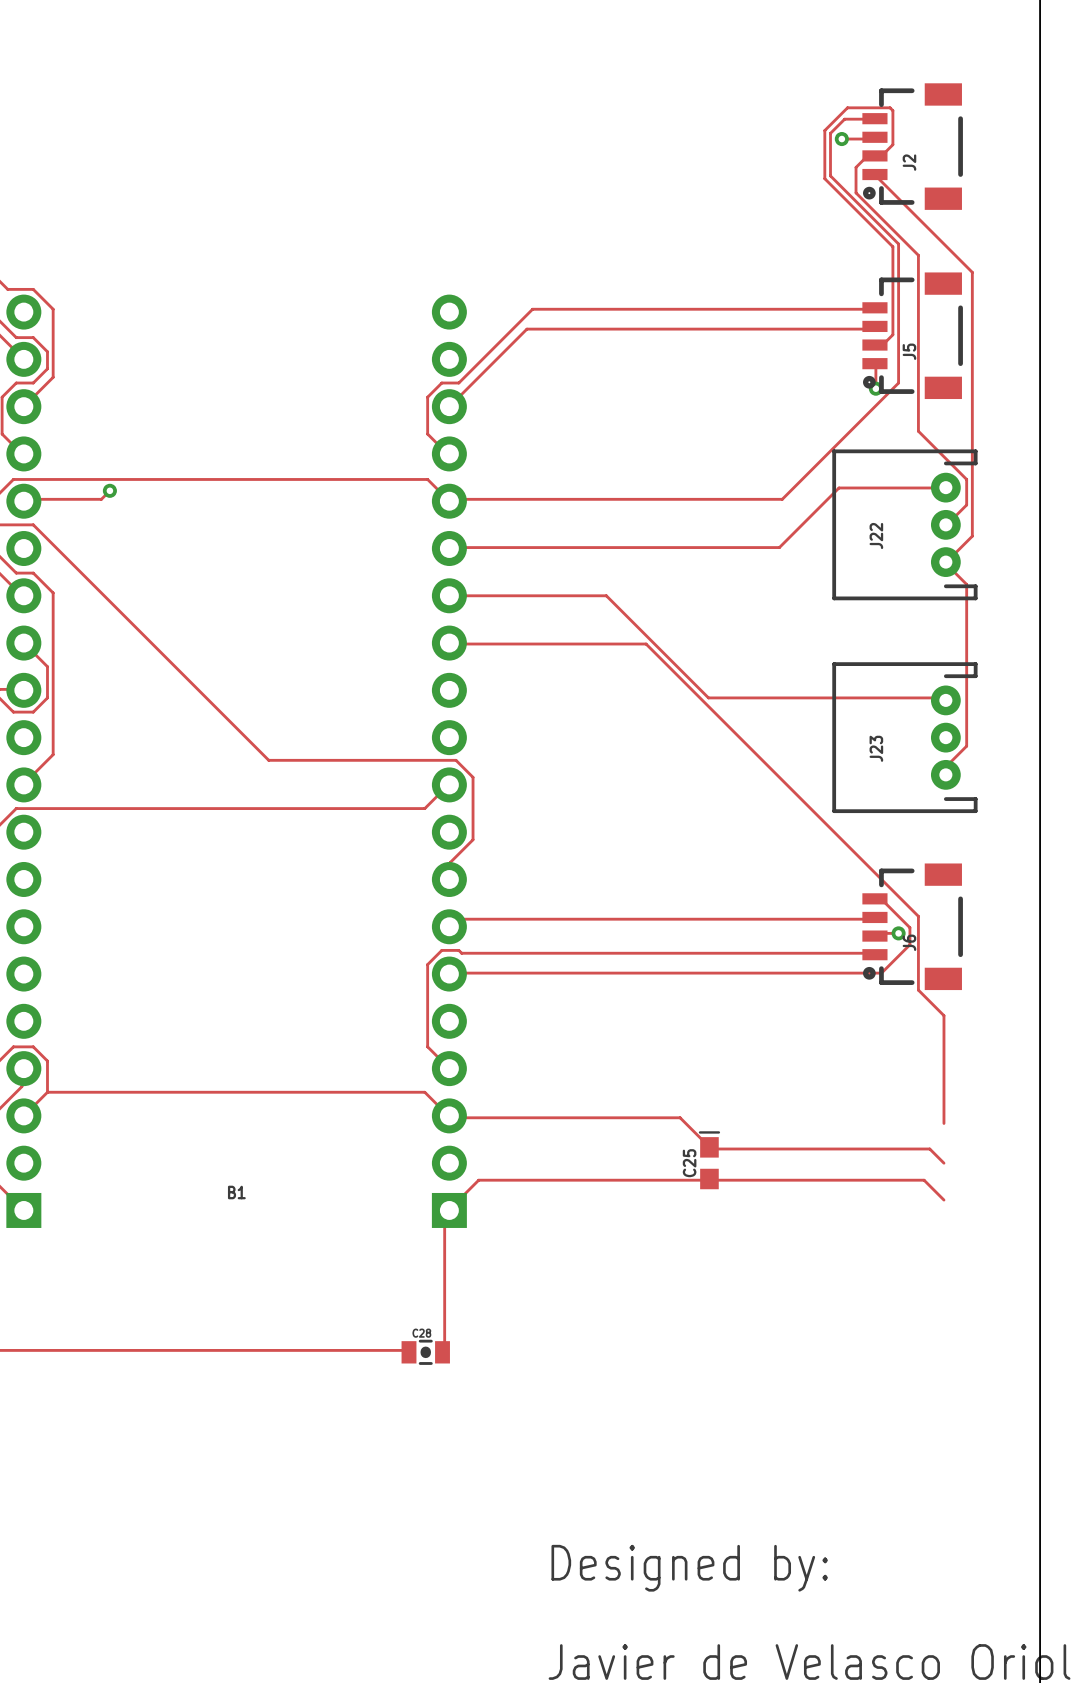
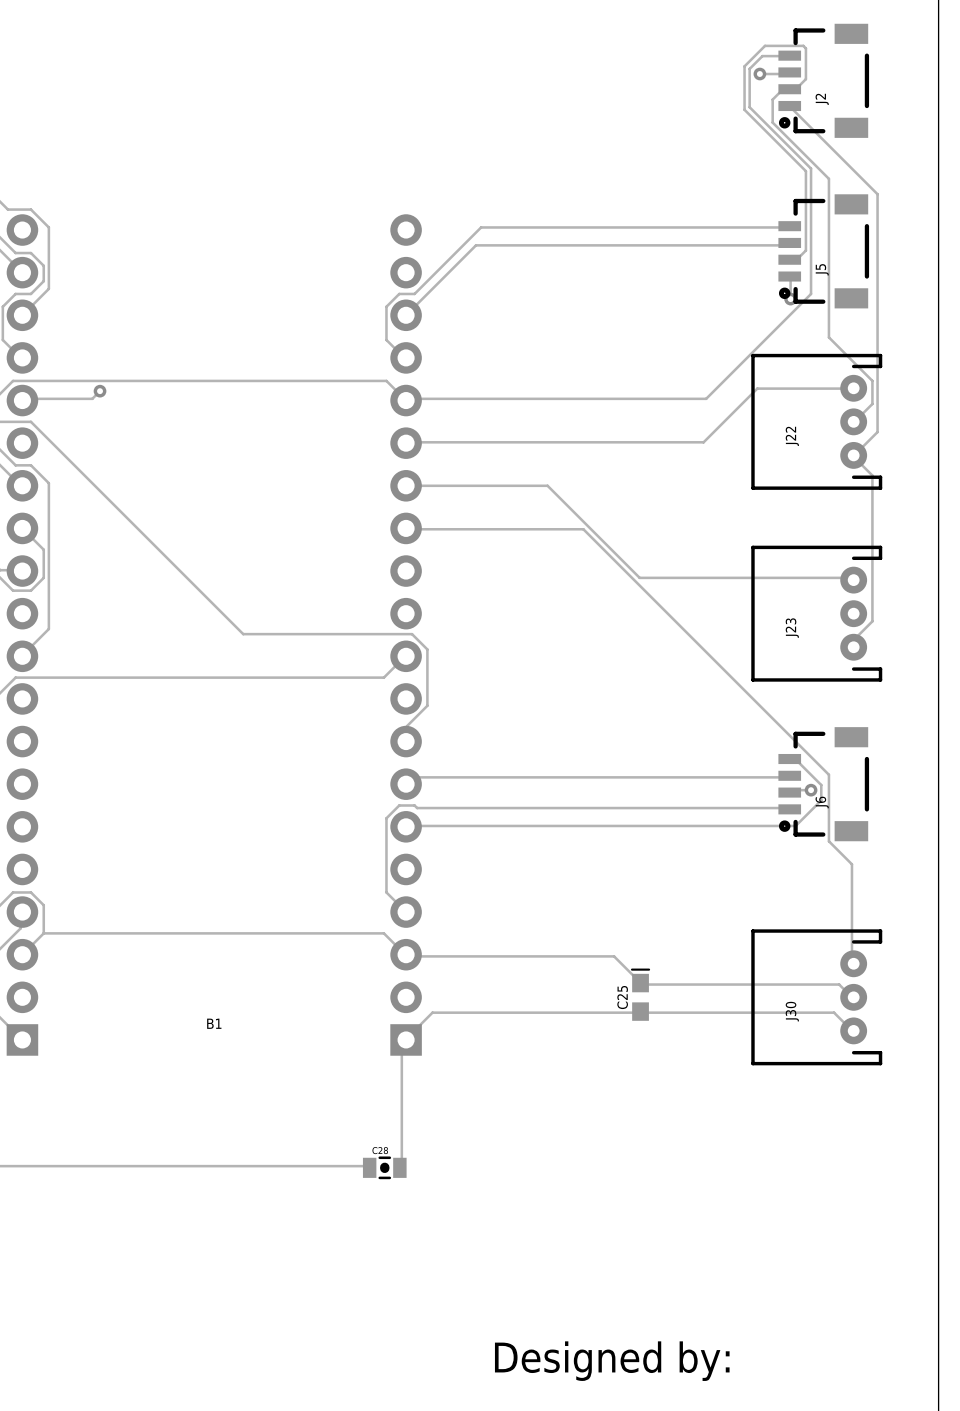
J30: none -> (816, 997)

